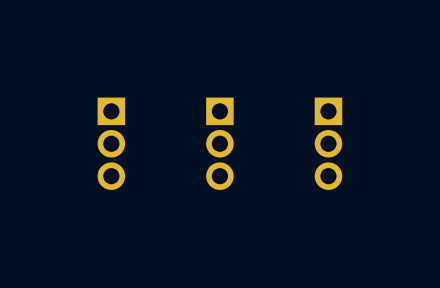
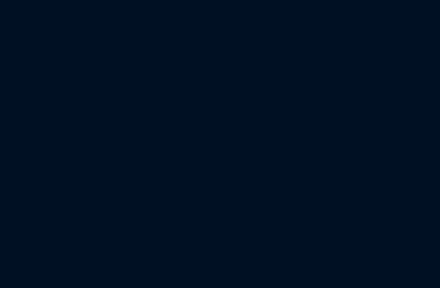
part: (111, 143) -> none
part: (219, 143) -> none
part: (328, 143) -> none

